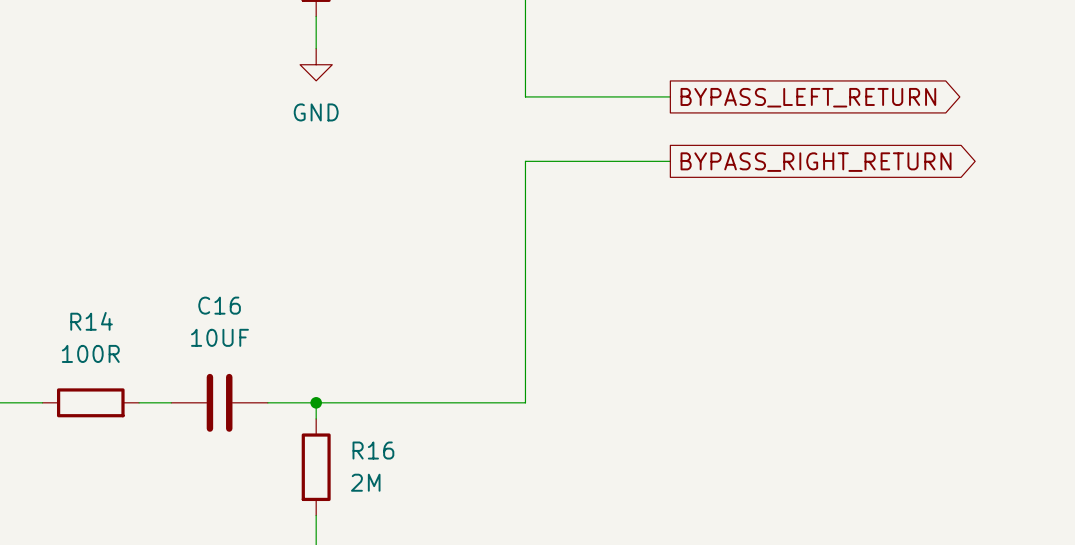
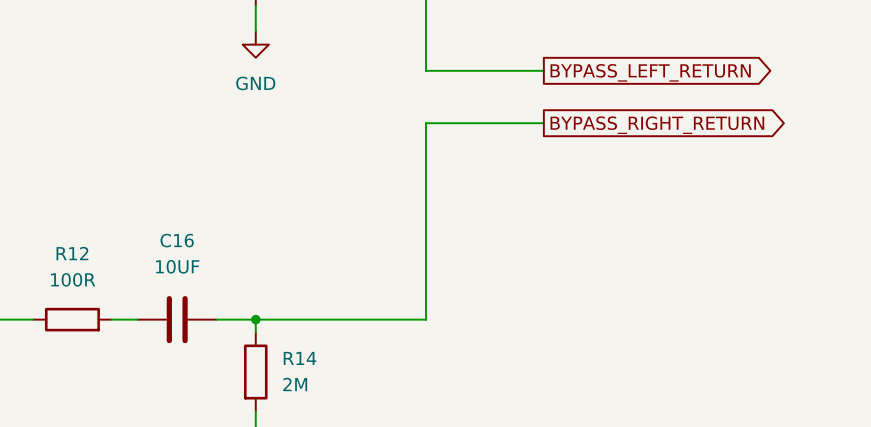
R14 name: R14 (91, 321) -> R12 (72, 253)
R16 name: R16 (373, 450) -> R14 (300, 358)

